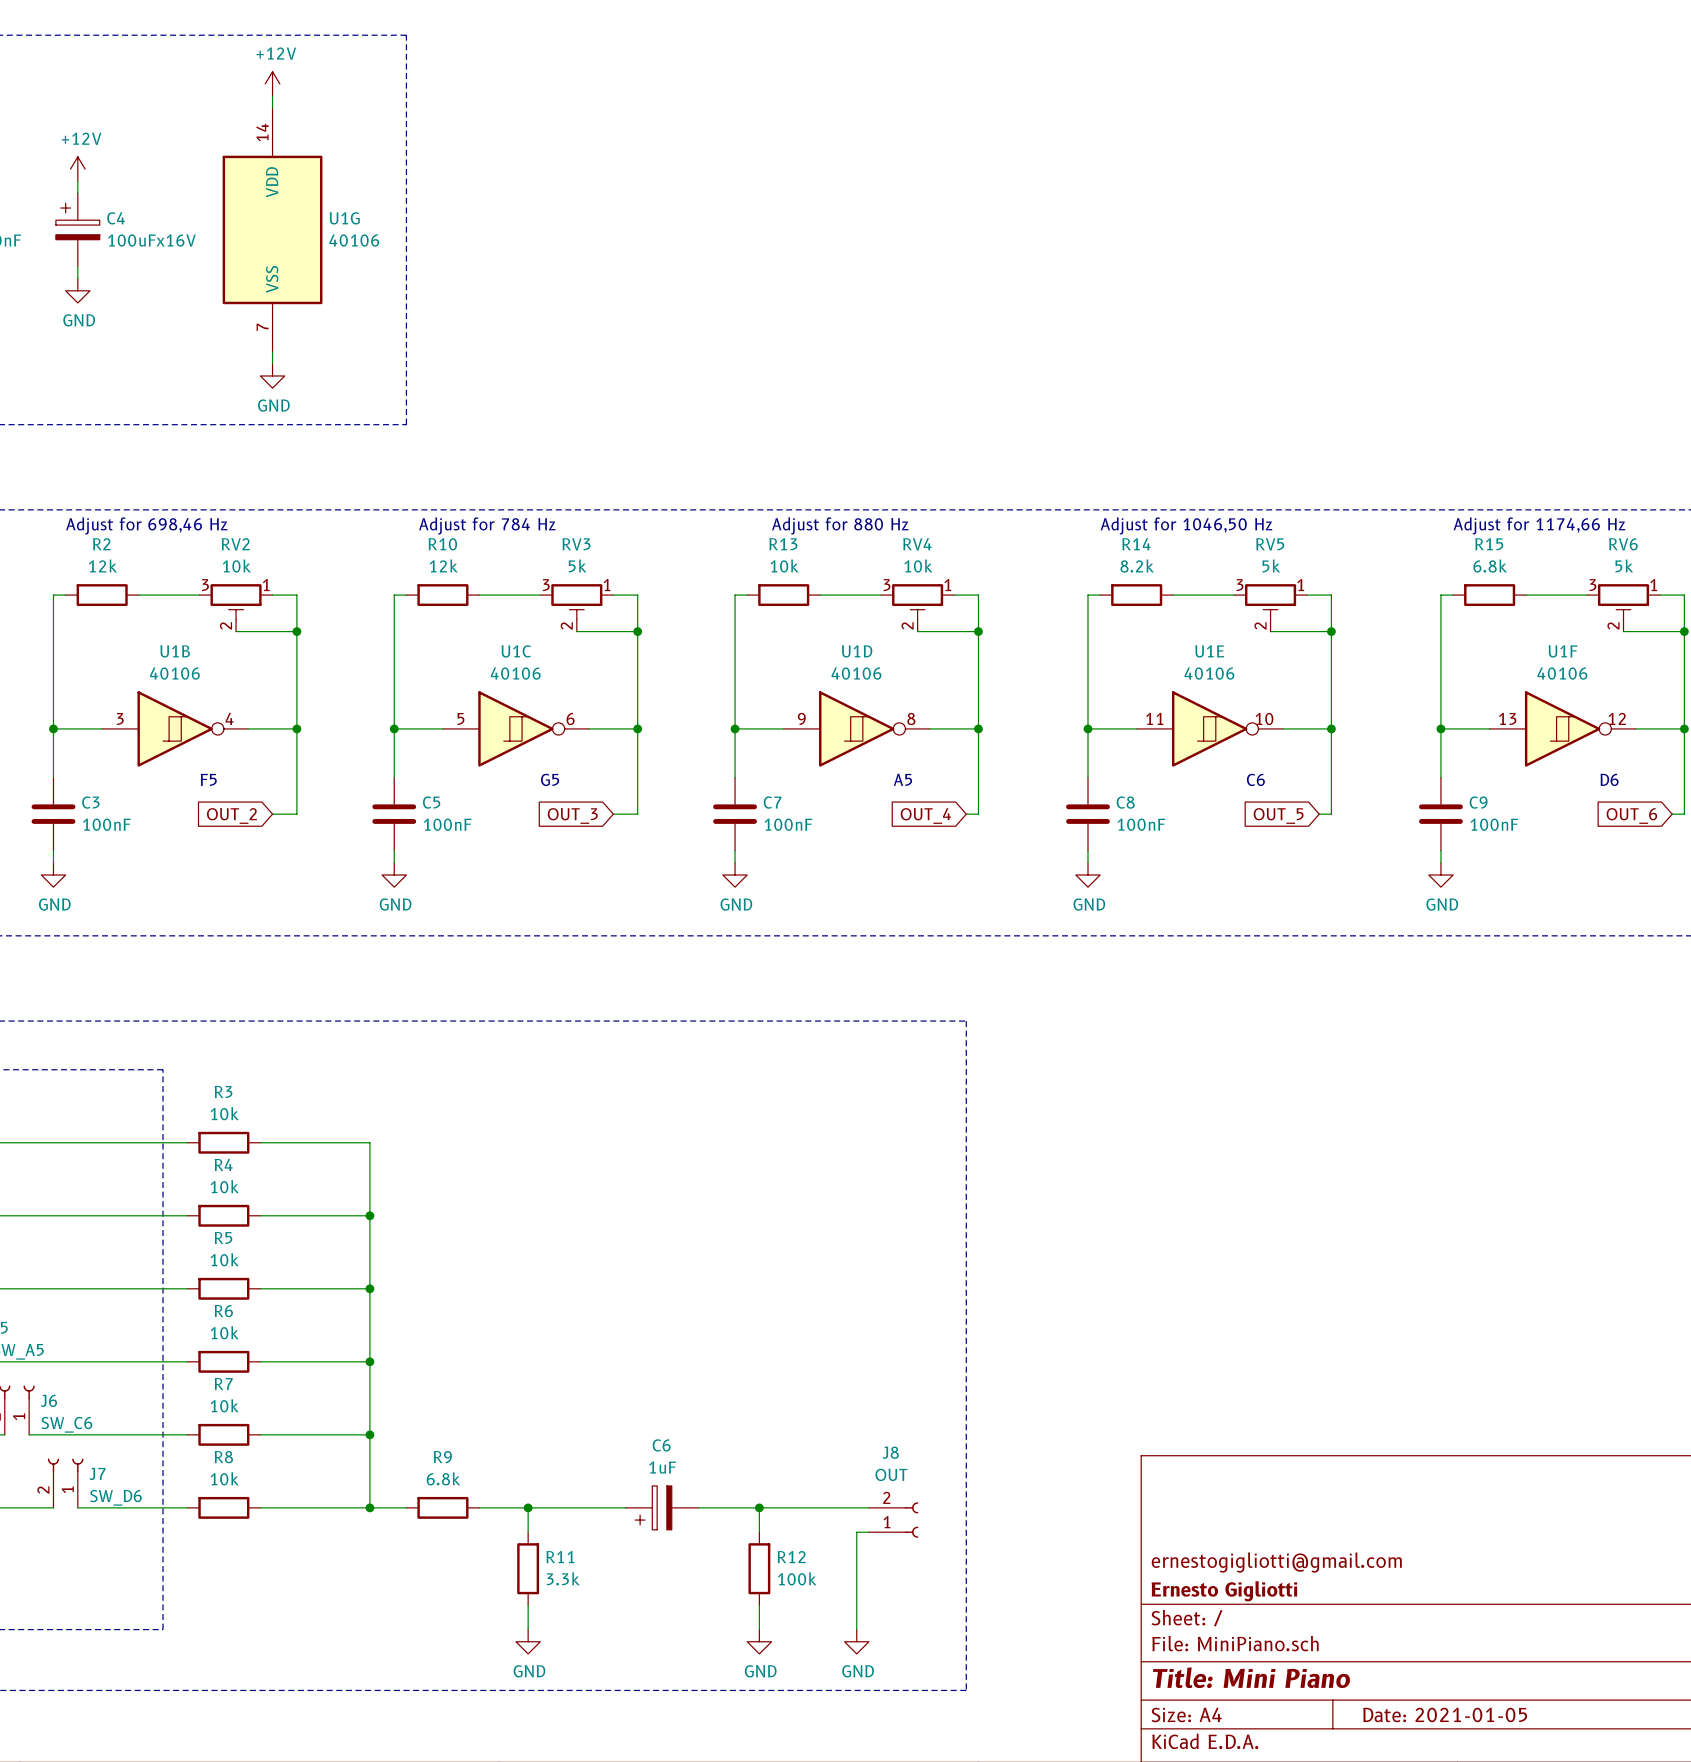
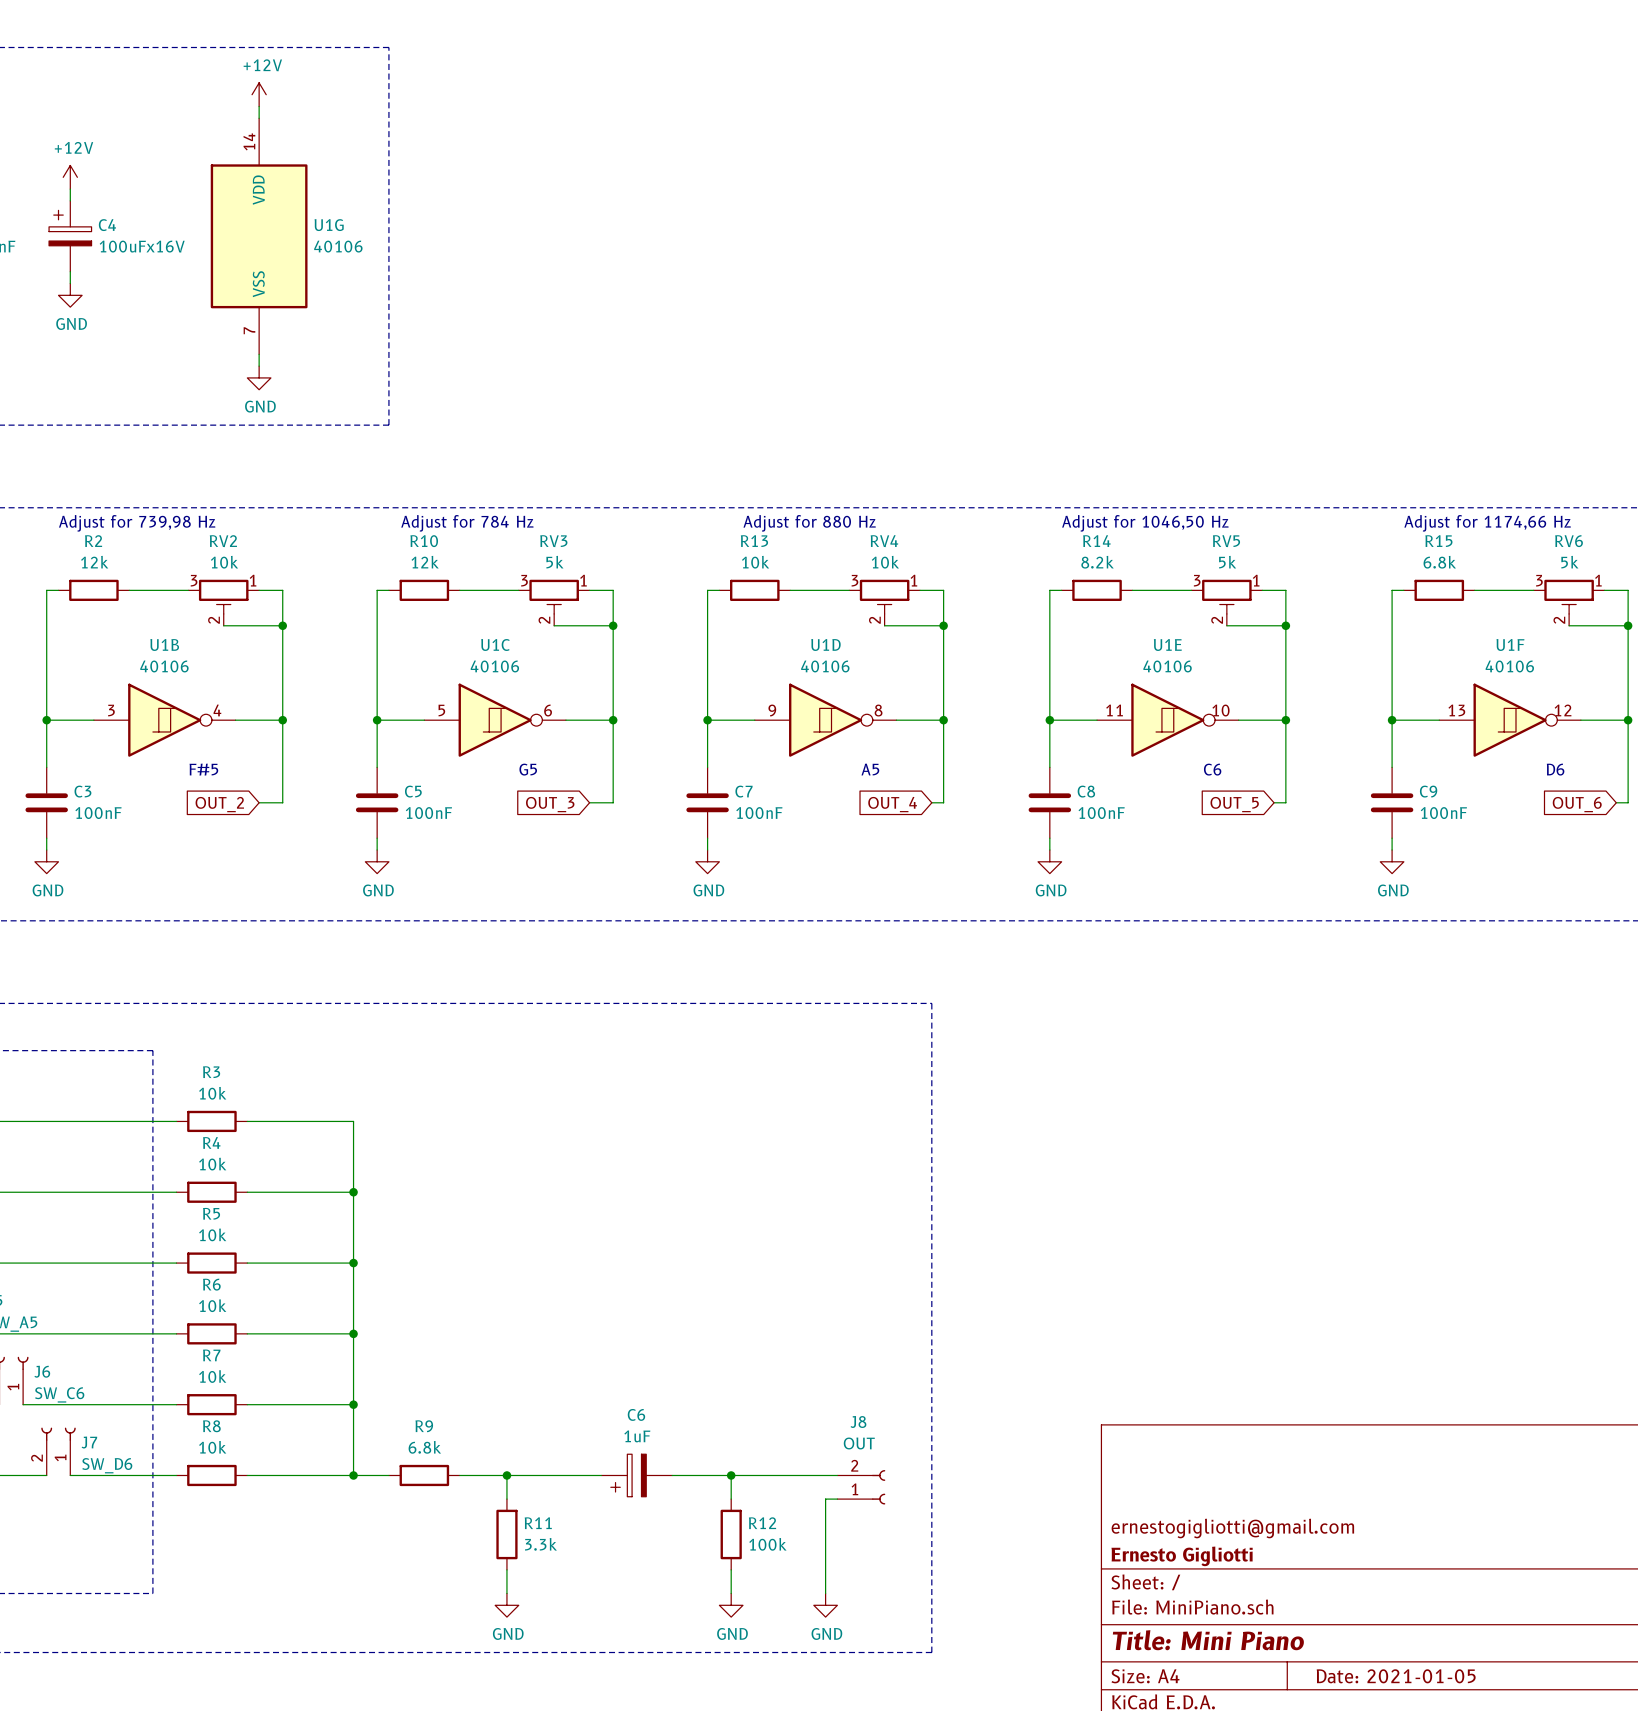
text: Adjust for 698,46 Hz (146, 525) -> Adjust for 739,98 Hz (137, 523)
text: F5 (208, 779) -> F#5 (203, 769)

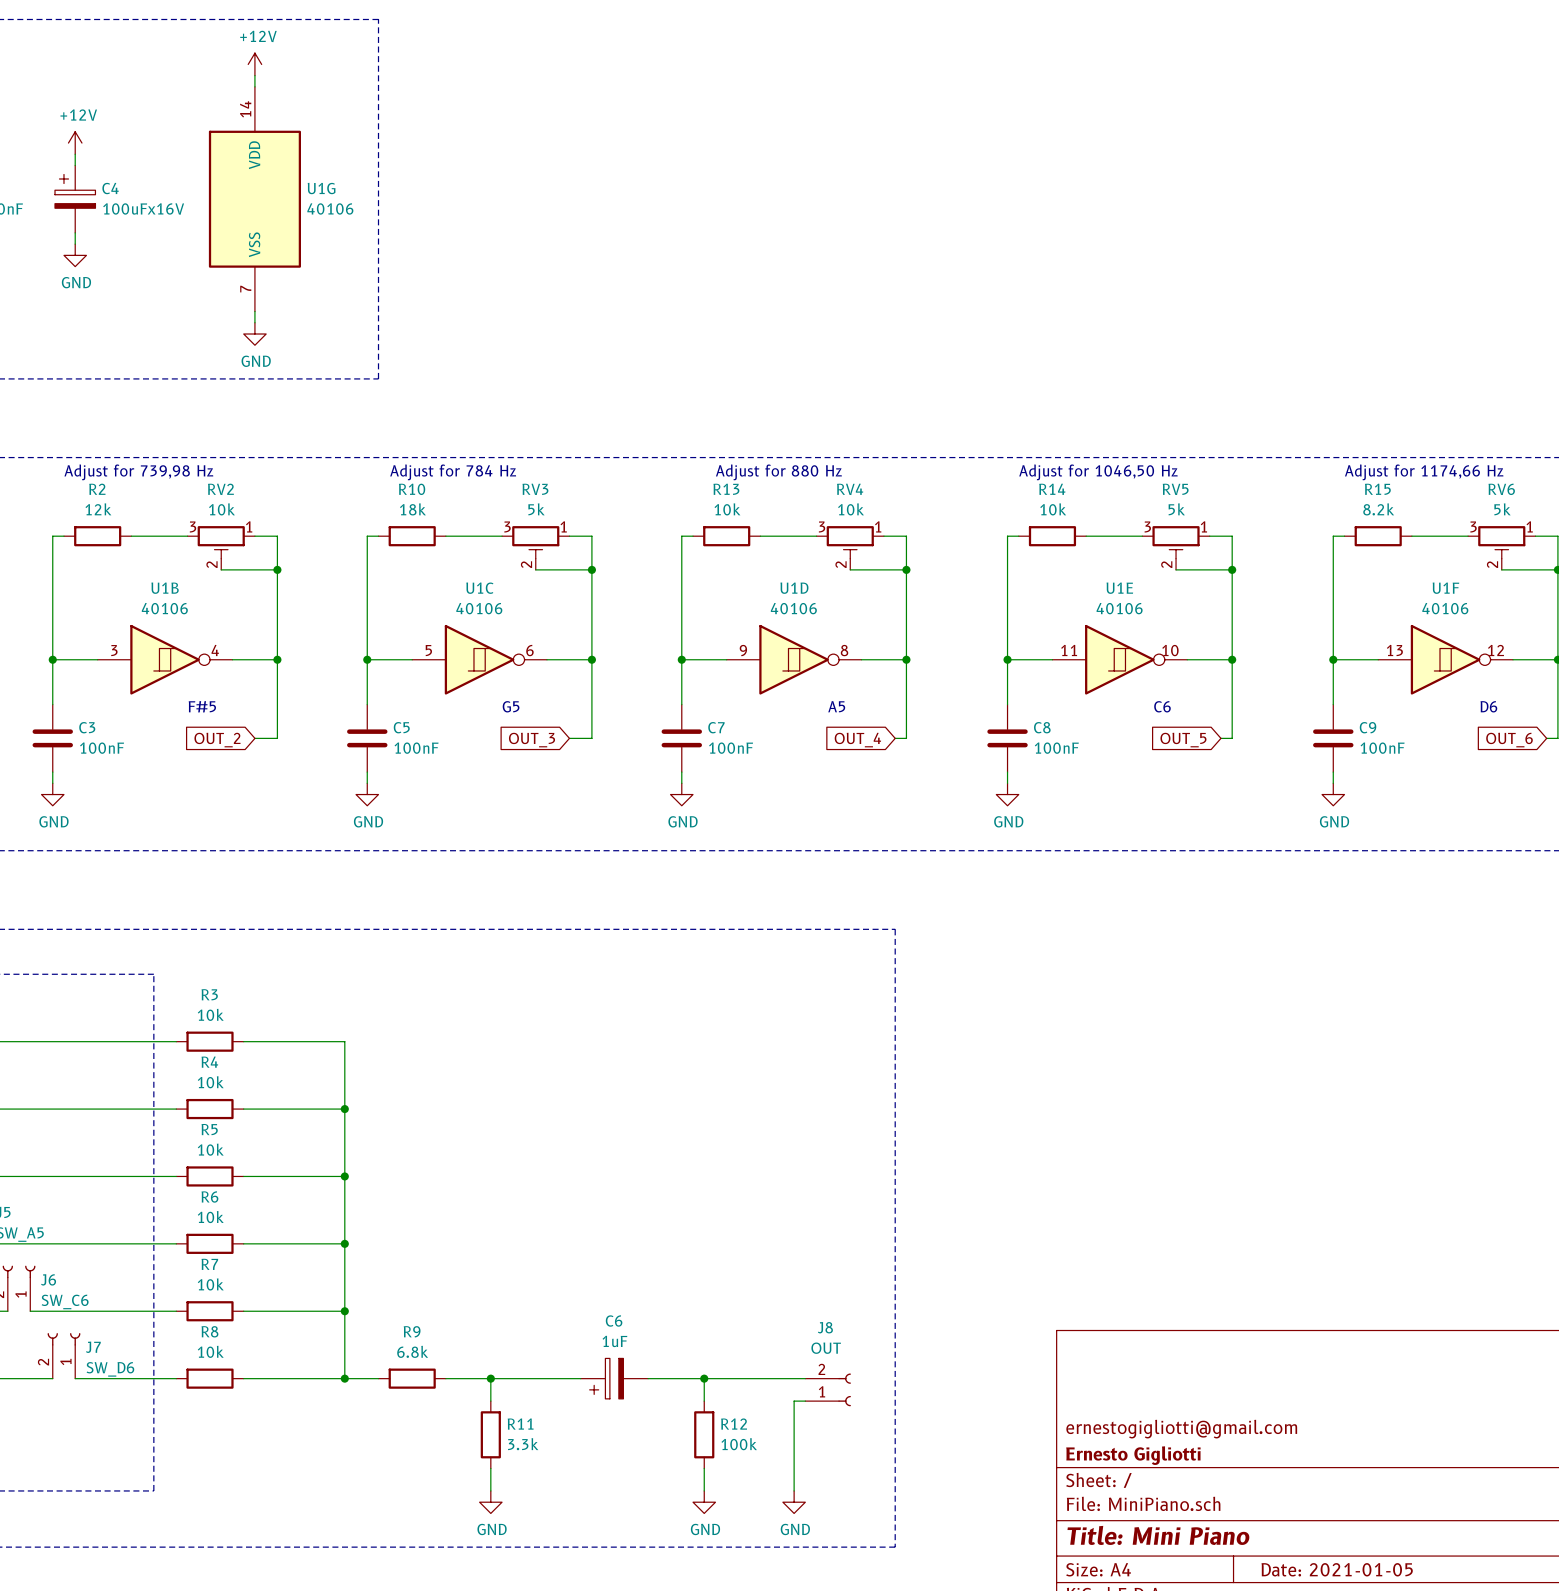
R10 value: 12k (425, 562) -> 18k (412, 509)
R14 value: 8.2k (1097, 562) -> 10k (1053, 509)
R15 value: 6.8k (1439, 562) -> 8.2k (1378, 509)

